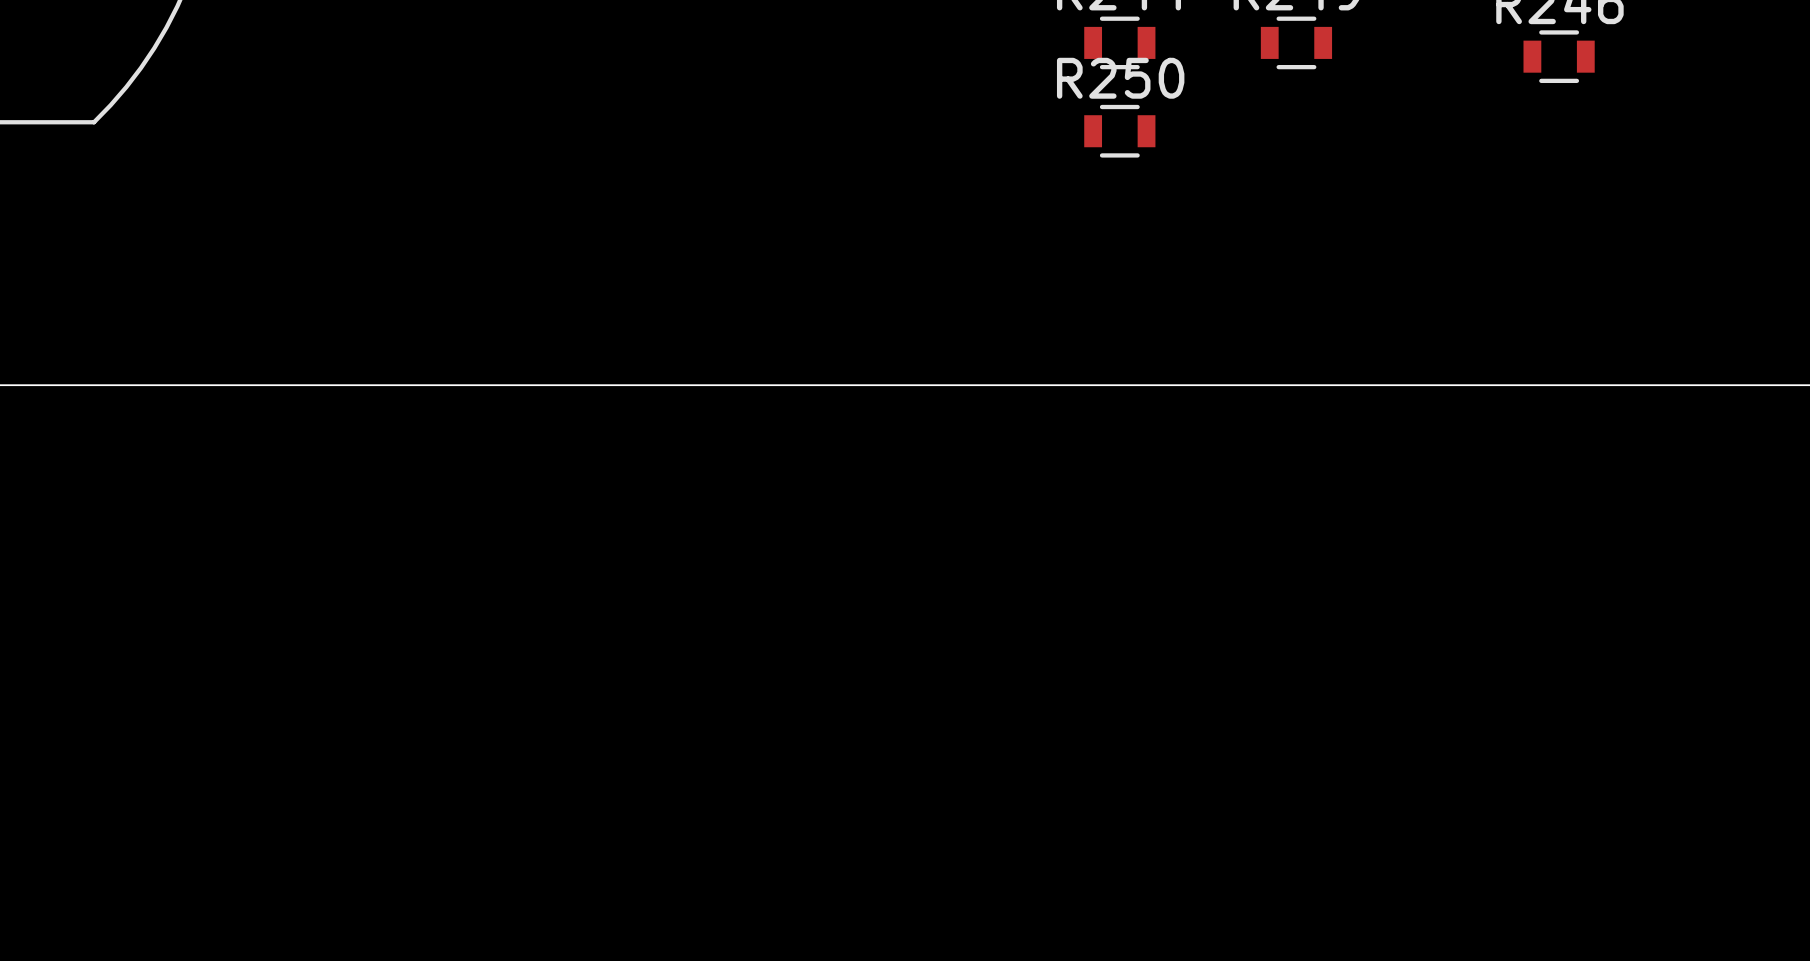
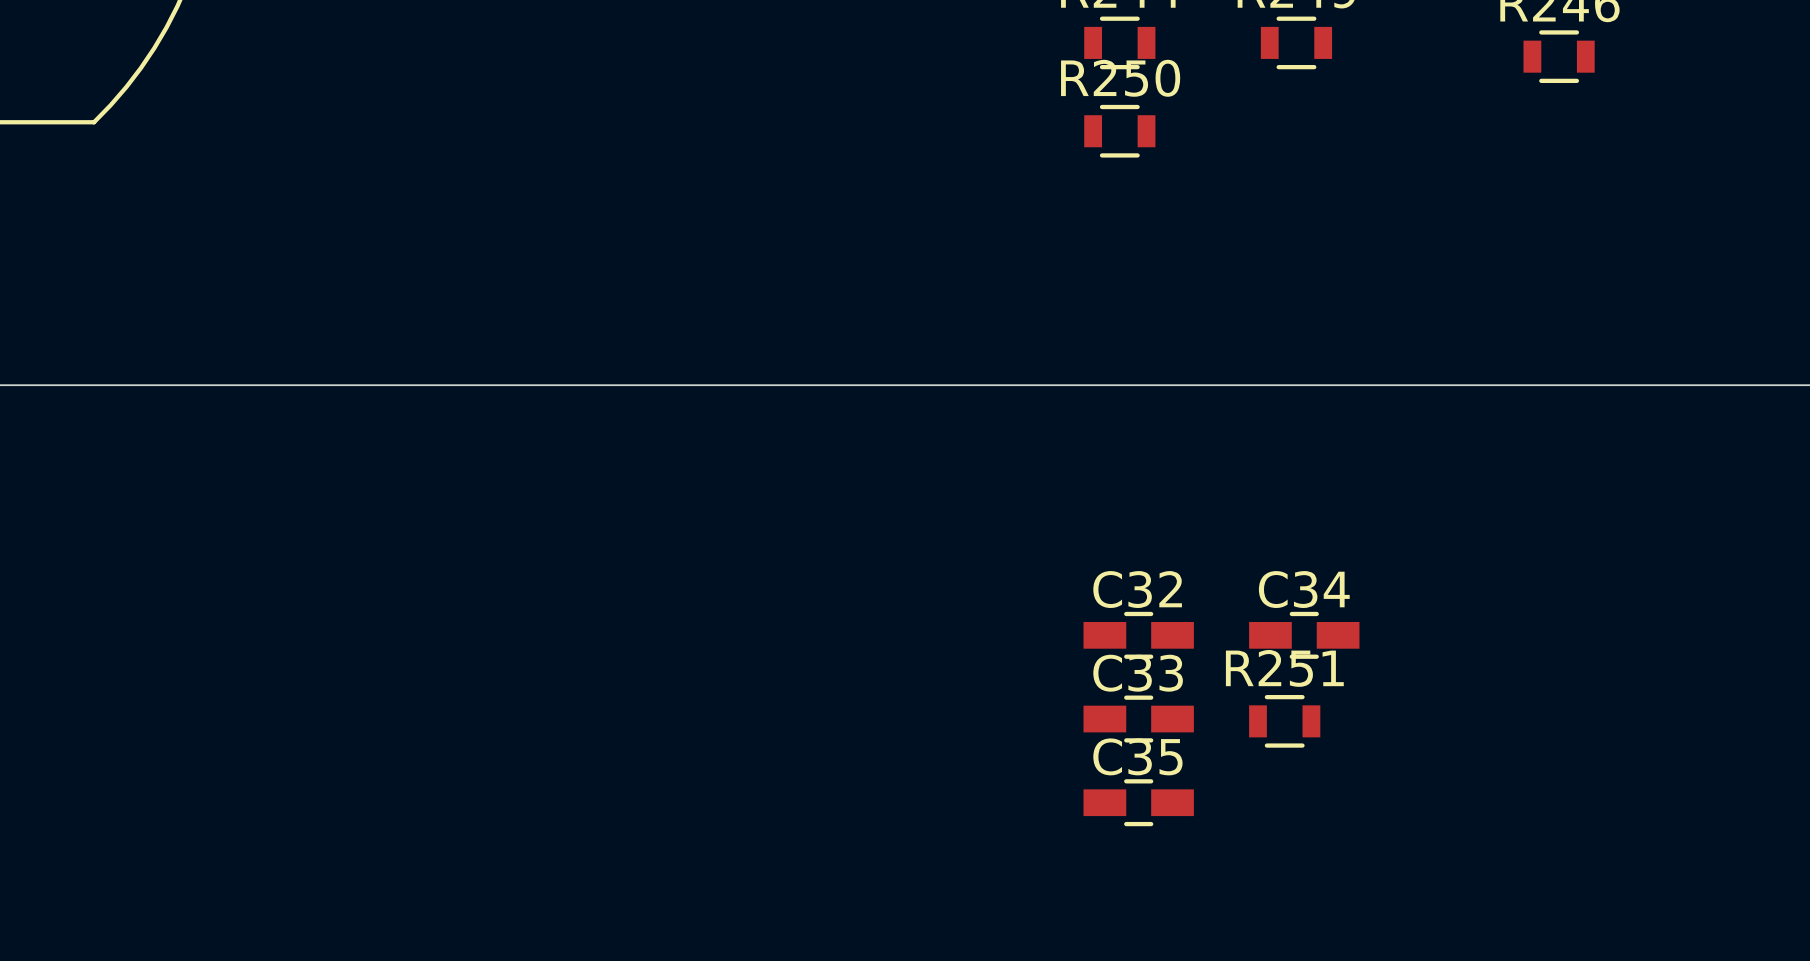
C32: none -> (1138, 635)
C34: none -> (1304, 635)
C33: none -> (1138, 719)
R251: none -> (1284, 721)
C35: none -> (1138, 802)

